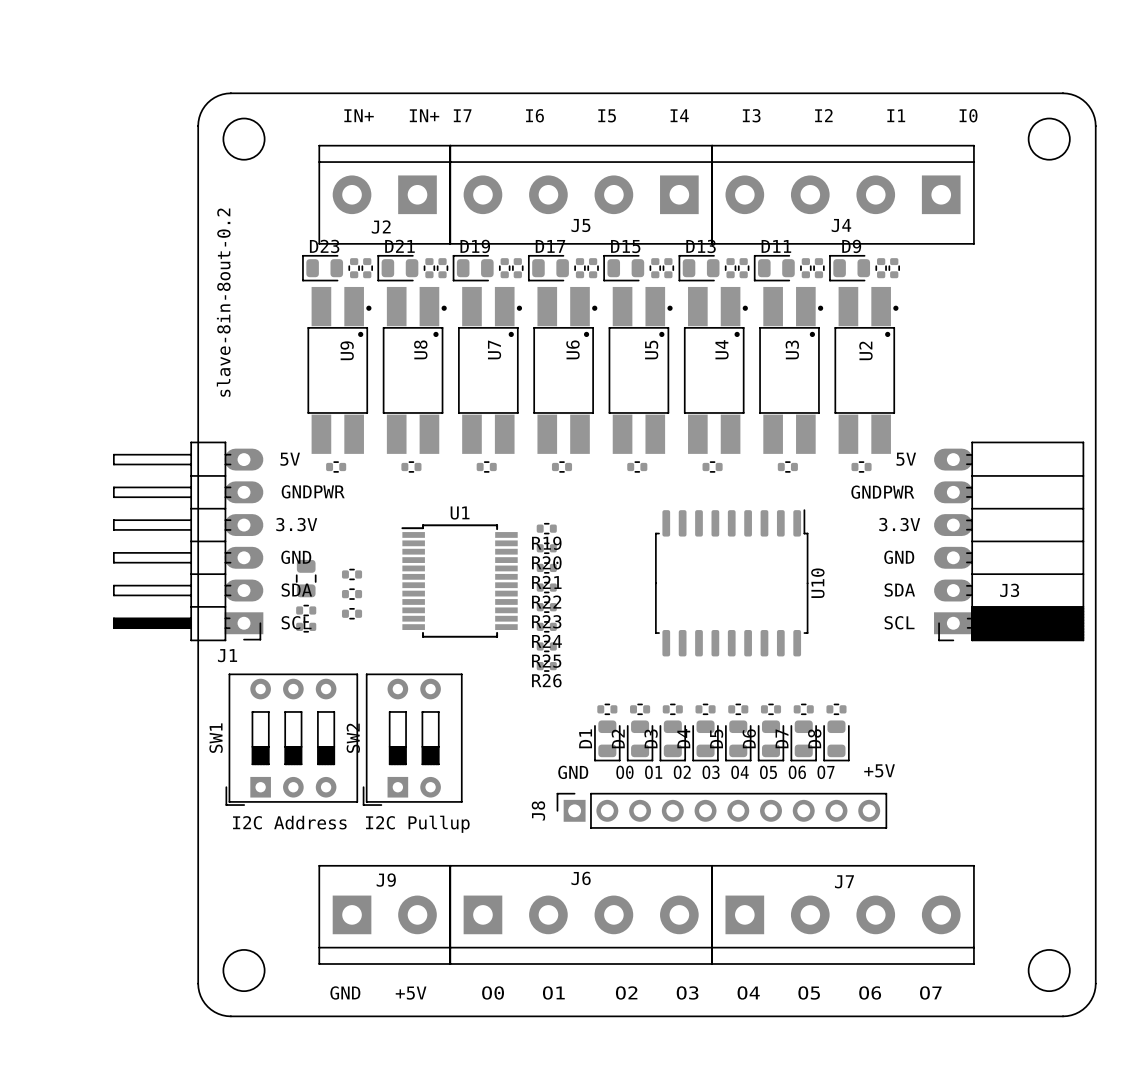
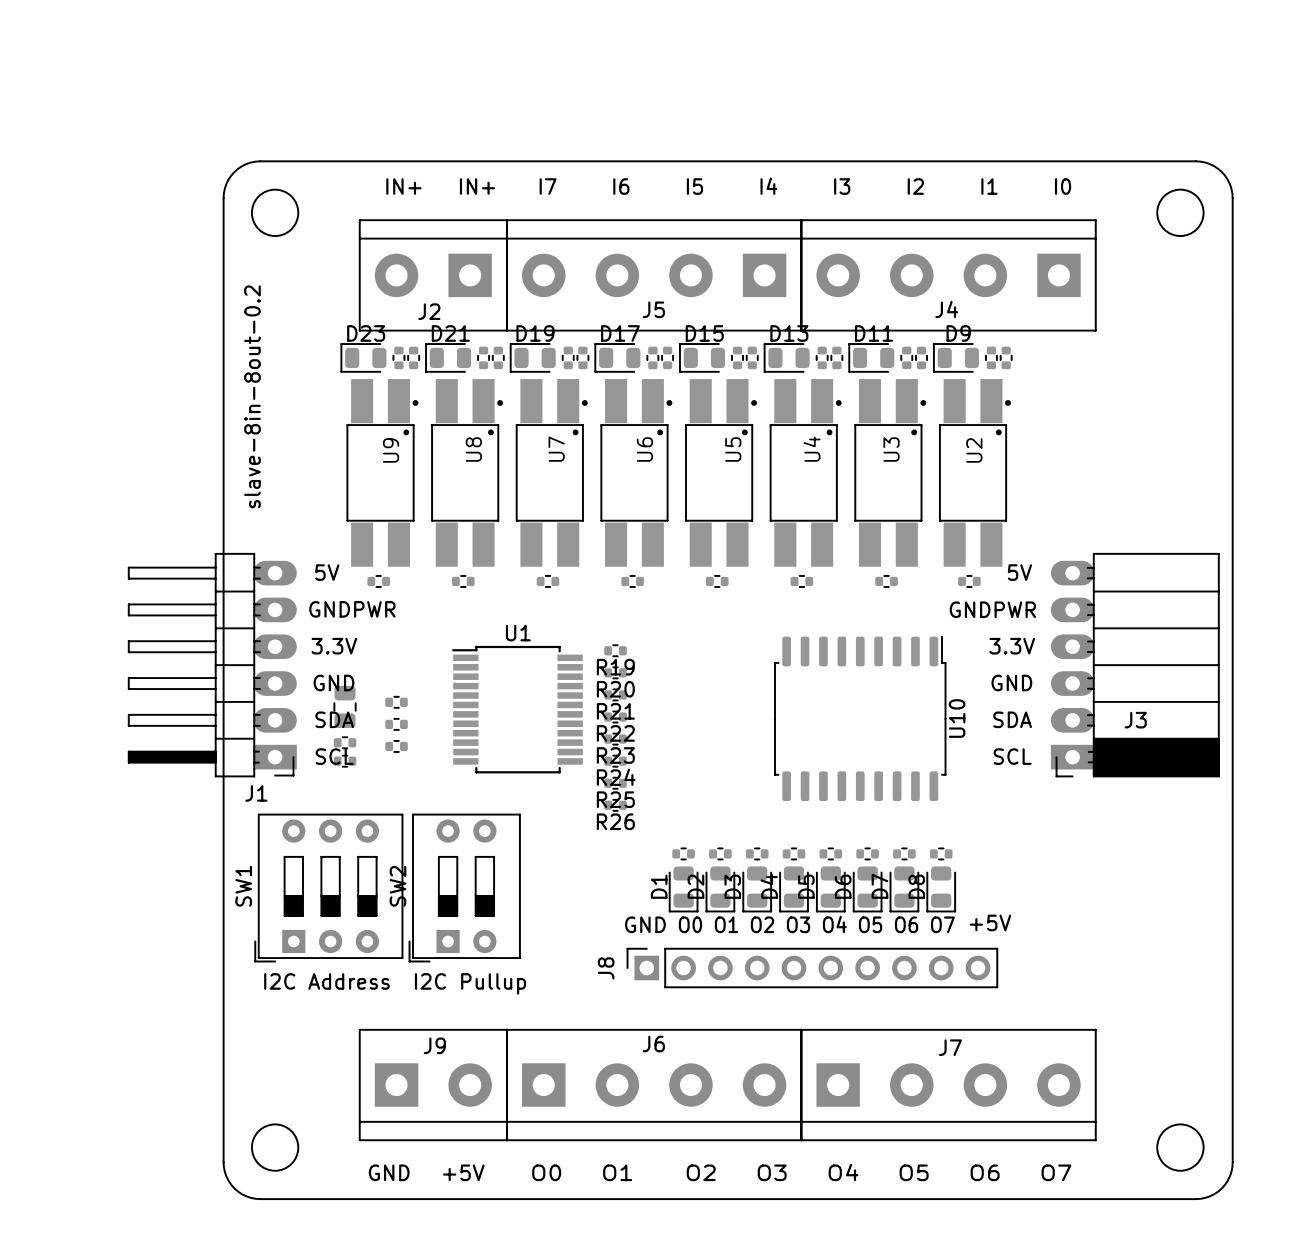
U10 position: (731, 582) -> (860, 718)

